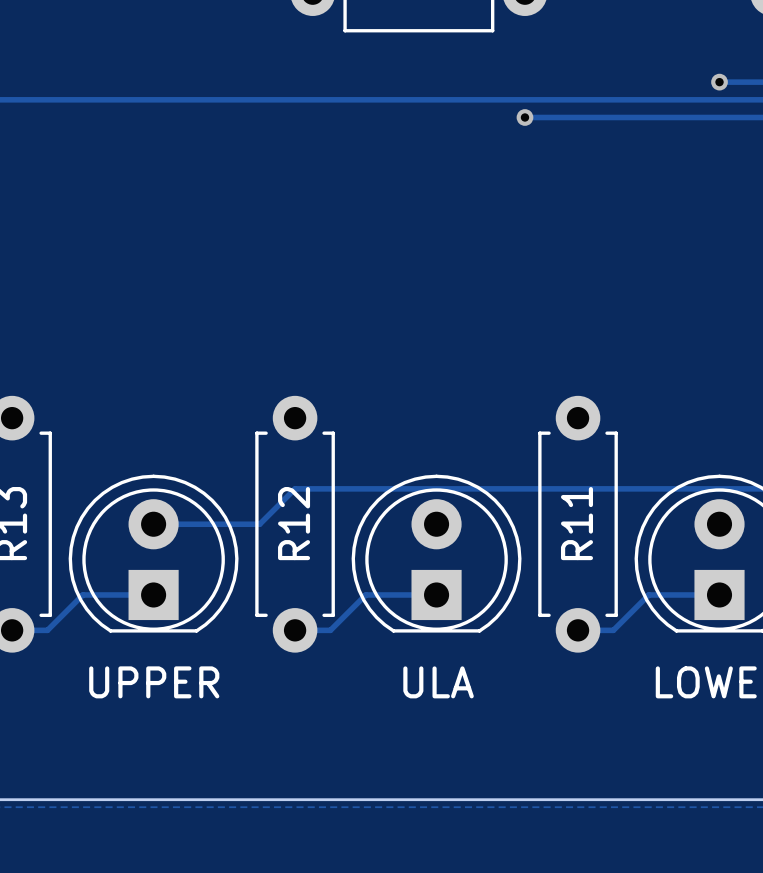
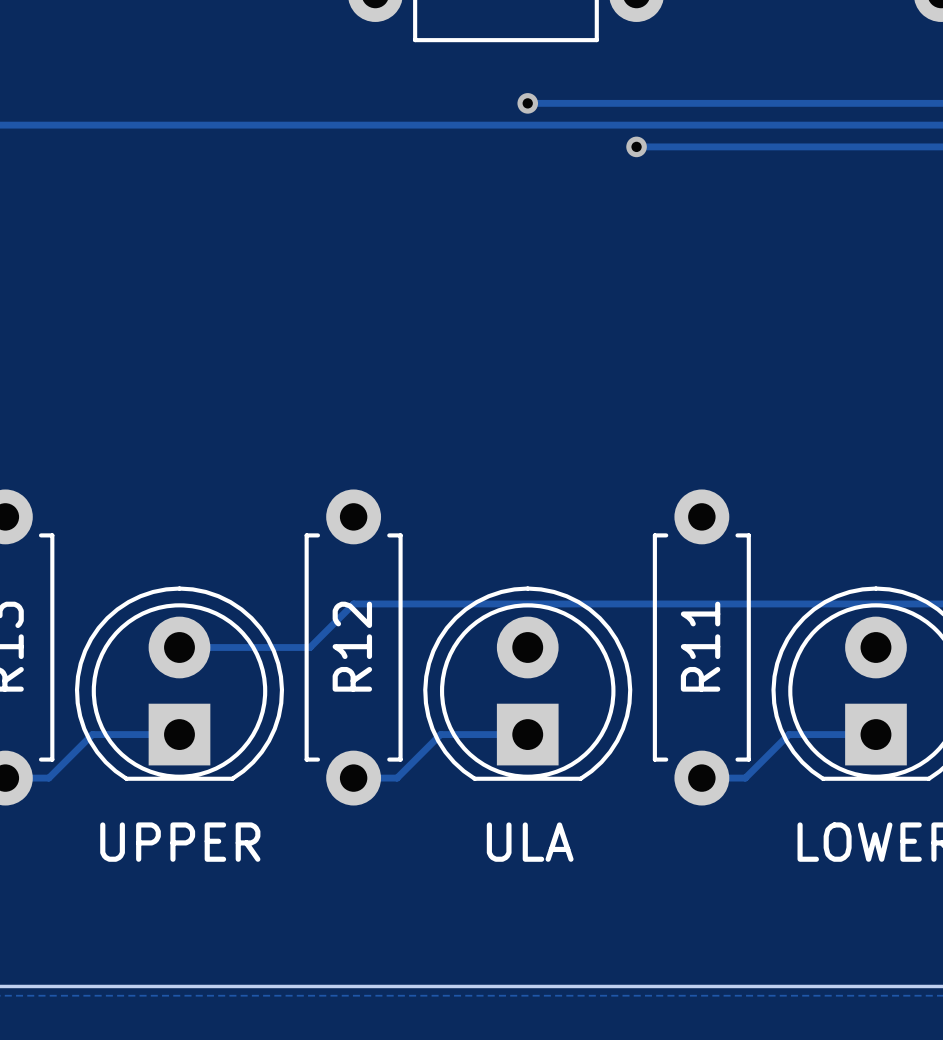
track: none -> (527, 103) (875, 103)
via: none -> (527, 103)
via: (719, 82) -> none

